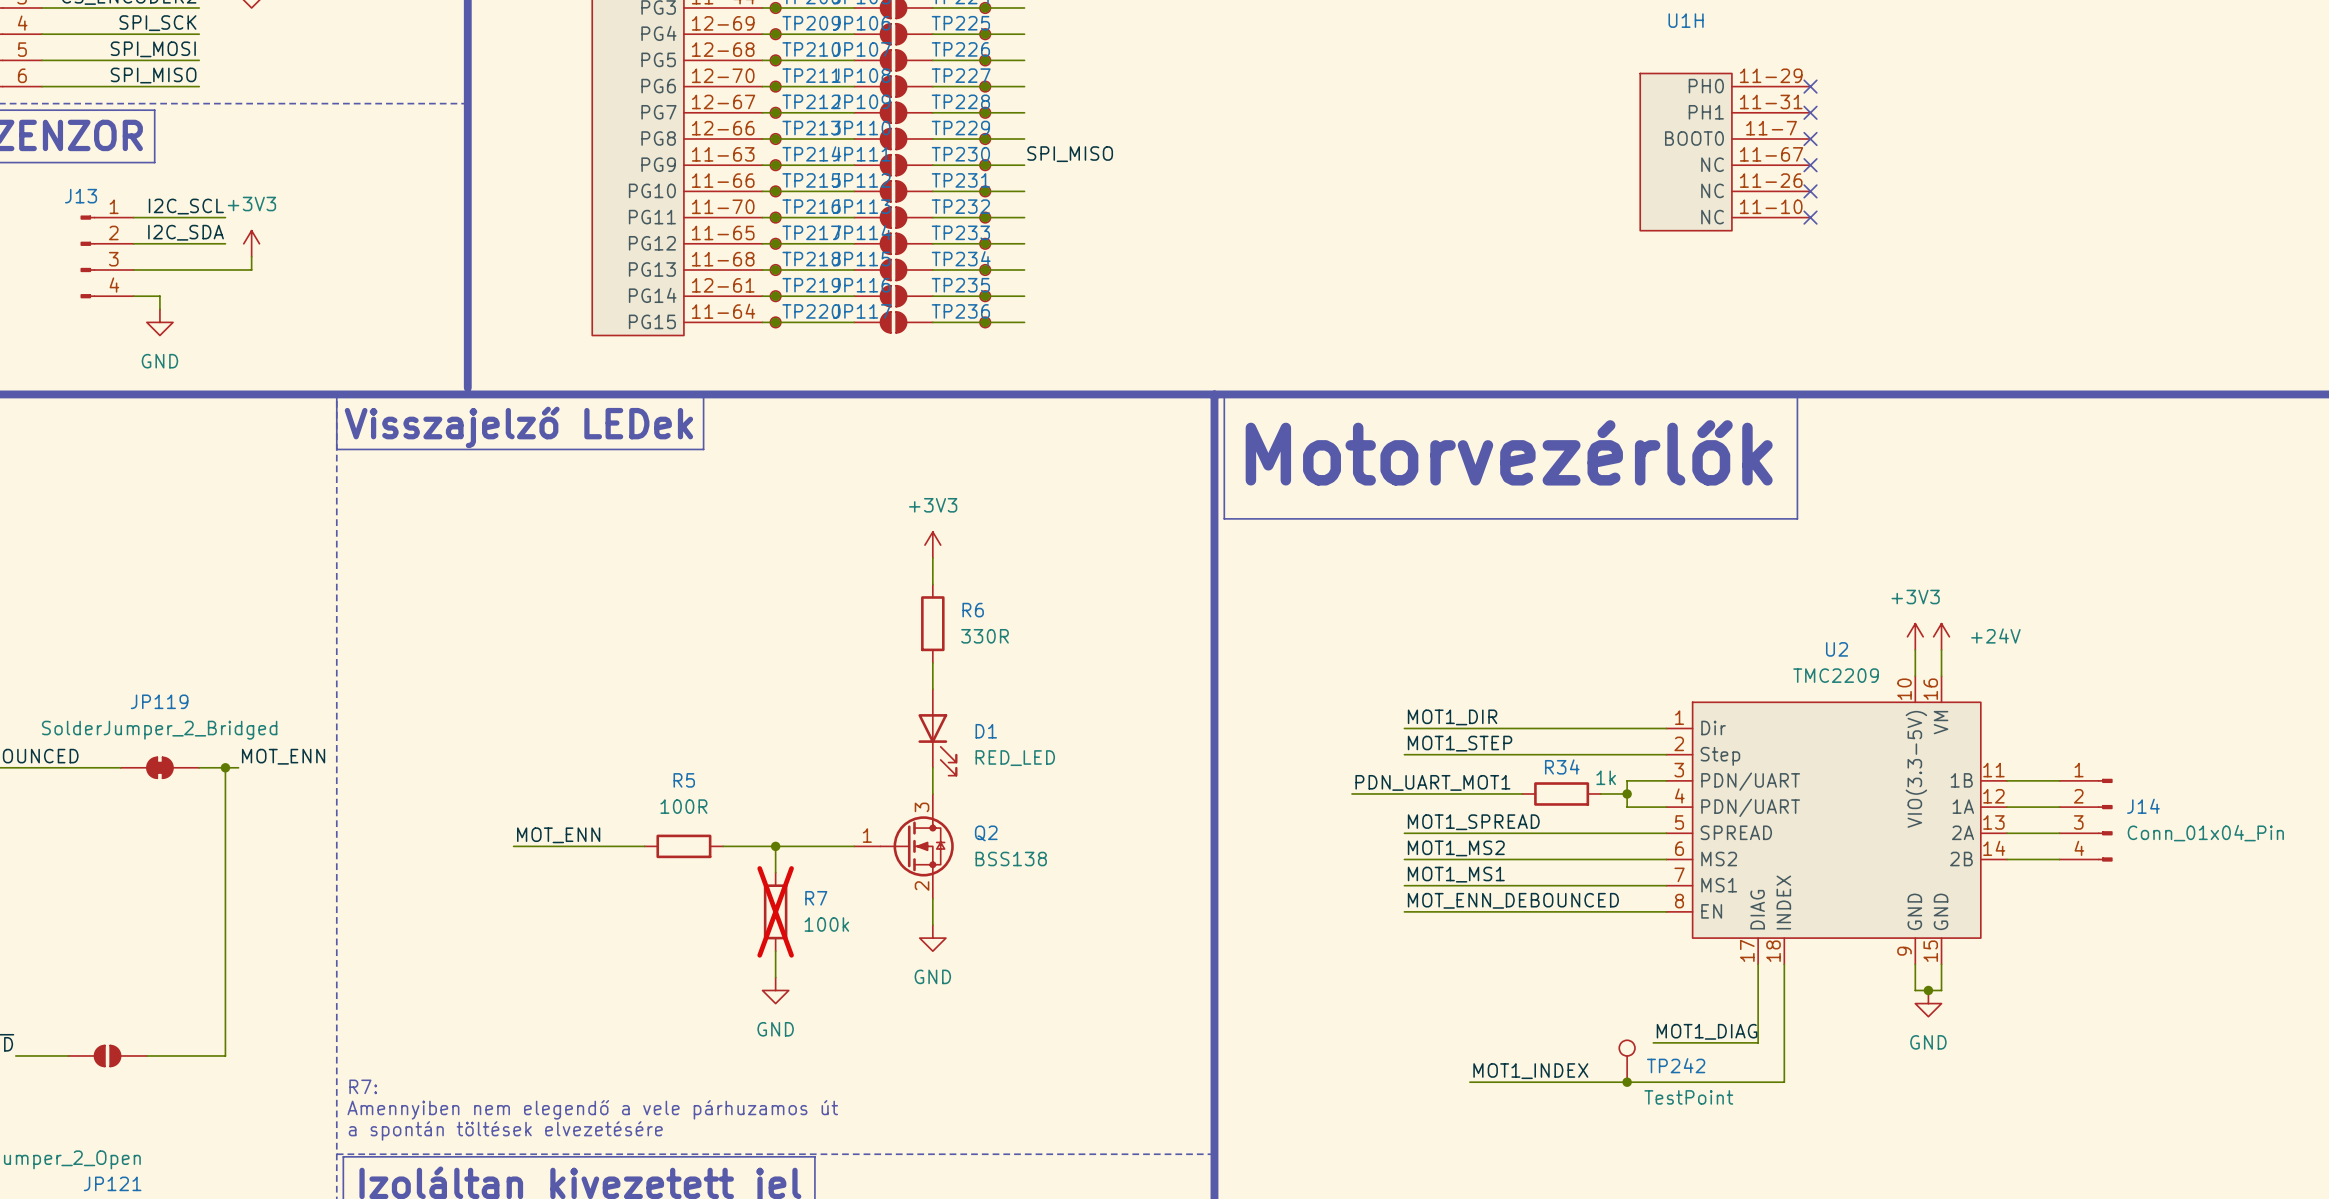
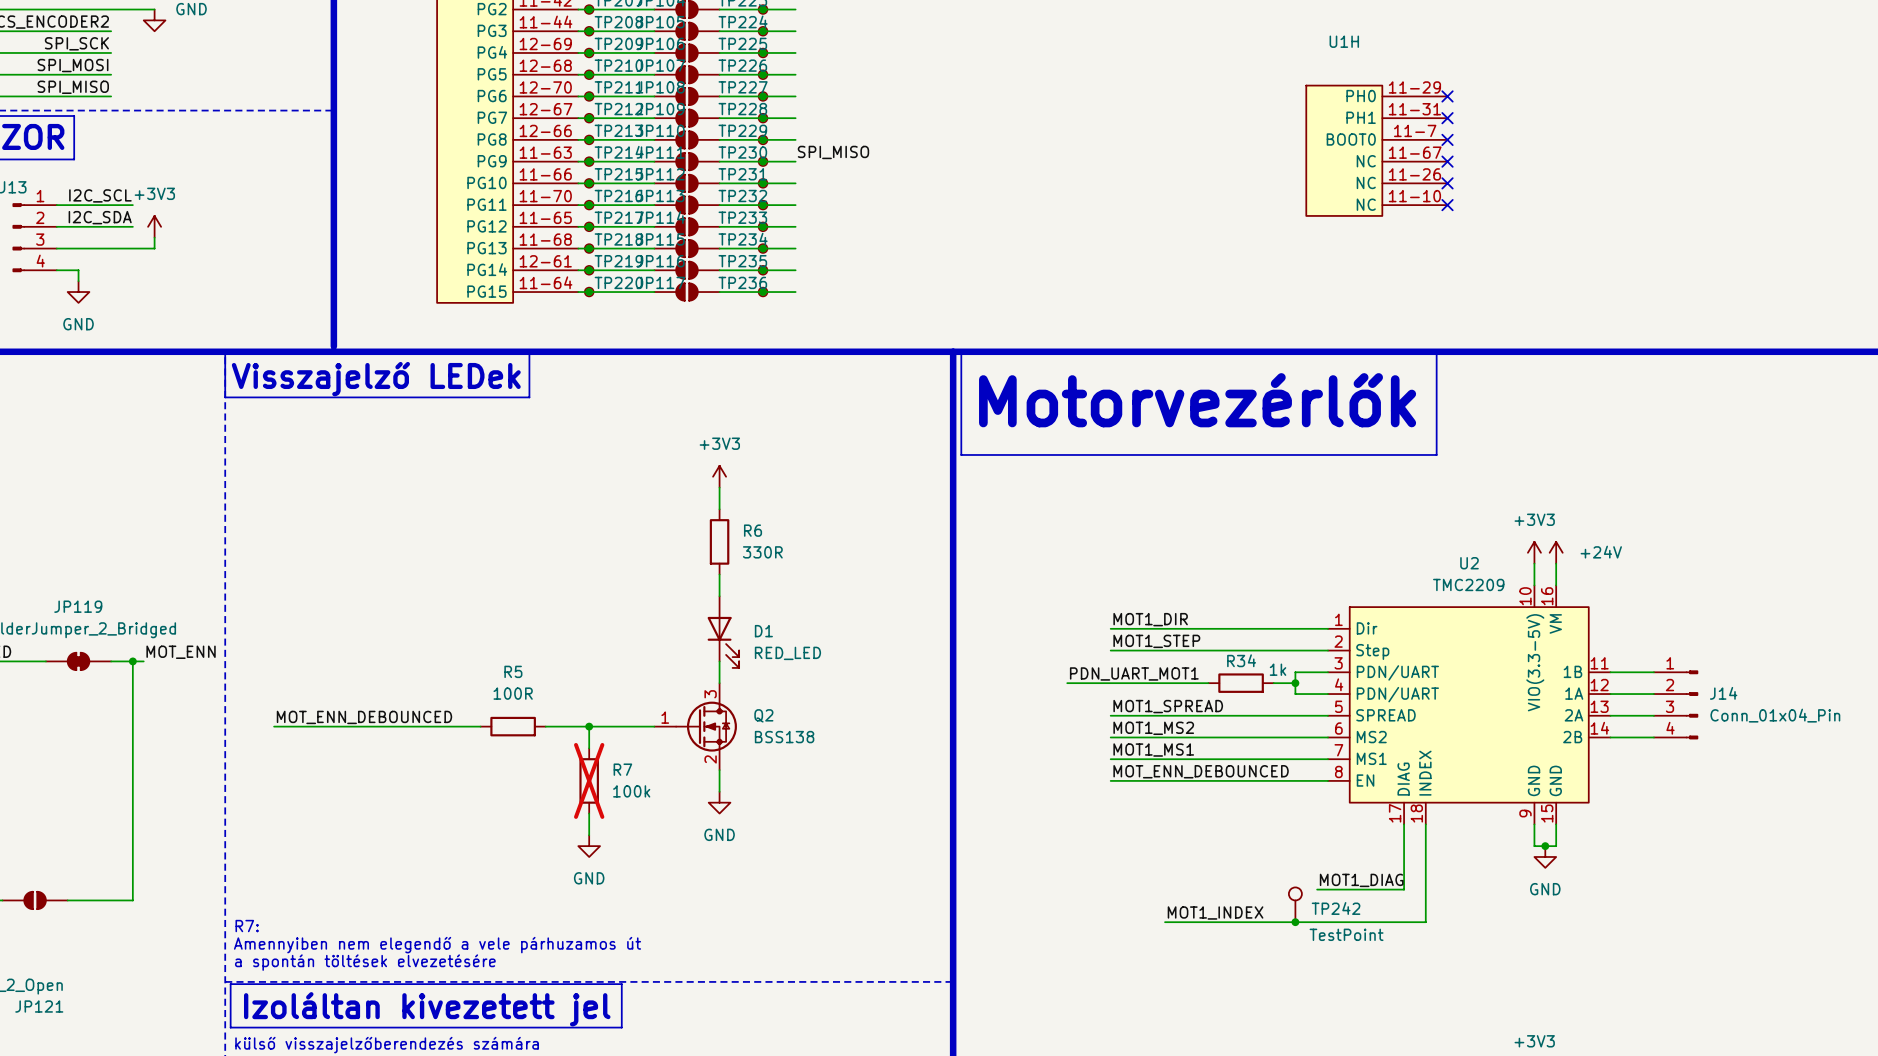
label: none -> MOT_ENN_DEBOUNCED (364, 717)
label: MOT_ENN (558, 835) -> none
wire: none -> (274, 726) (371, 726)

